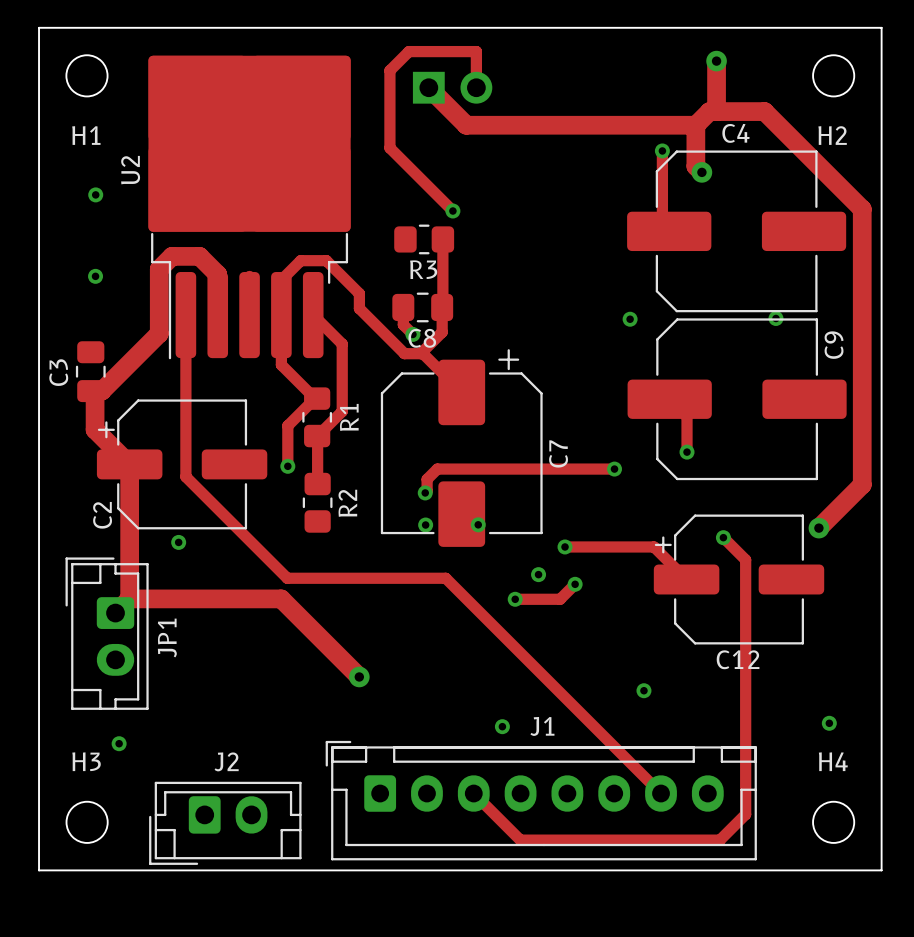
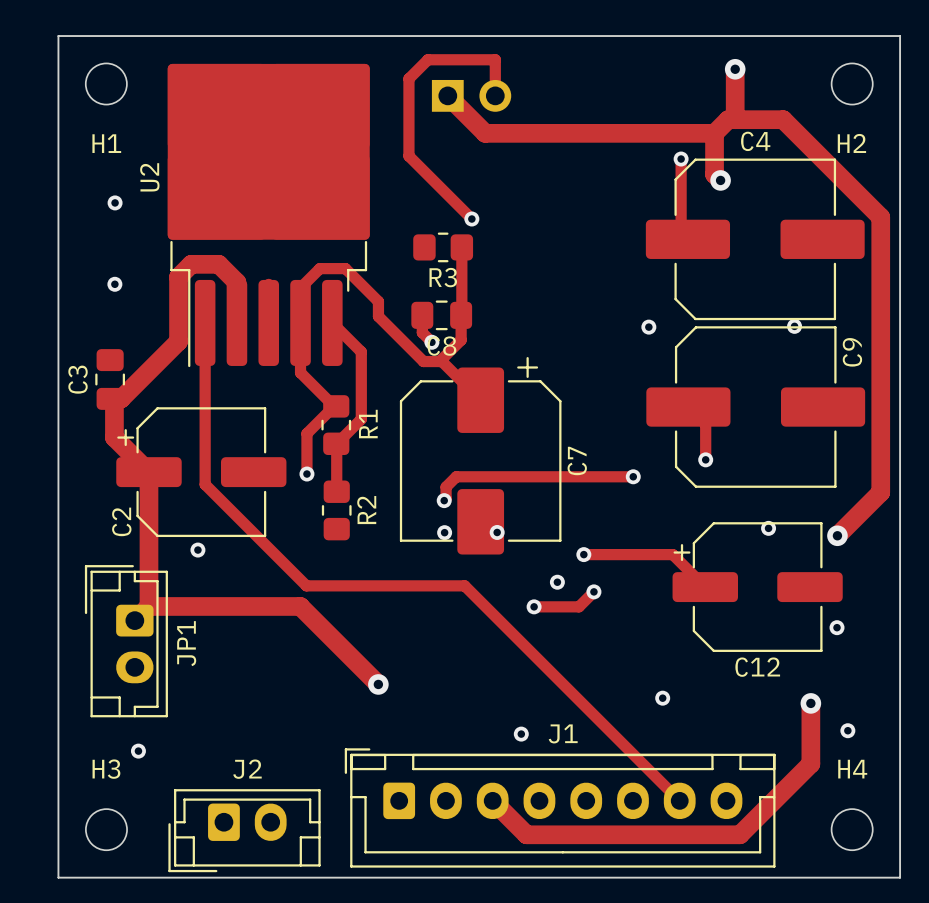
track: (723, 537) (745, 559) (745, 814) (719, 840) (520, 840) (507, 827) -> (810, 703) (810, 763) (739, 834) (526, 834)
via position: (723, 537) -> (768, 528)
via: none -> (837, 627)
via: none -> (810, 703)
track width: thin (473, 793) (507, 827) -> thick (492, 800) (526, 834)

